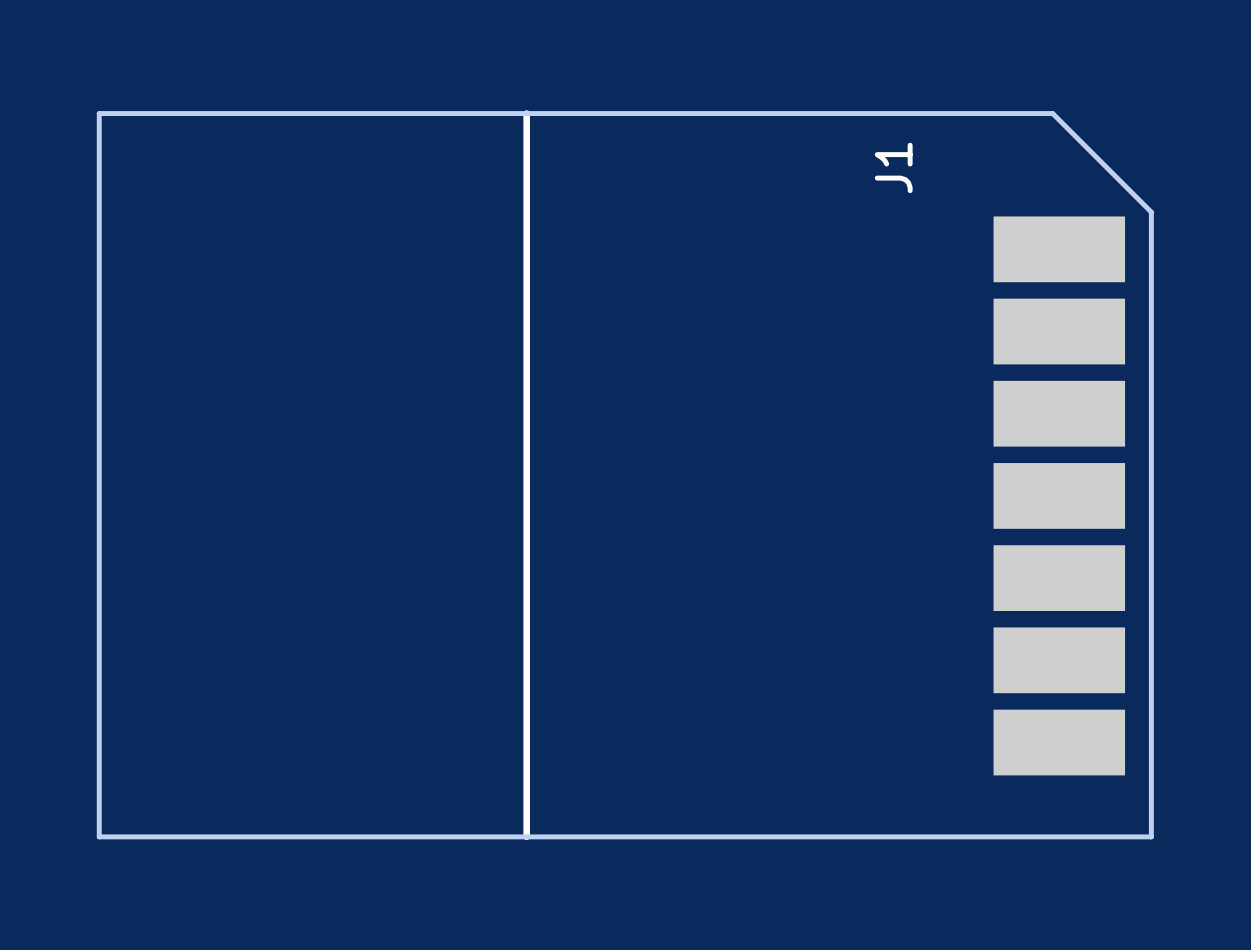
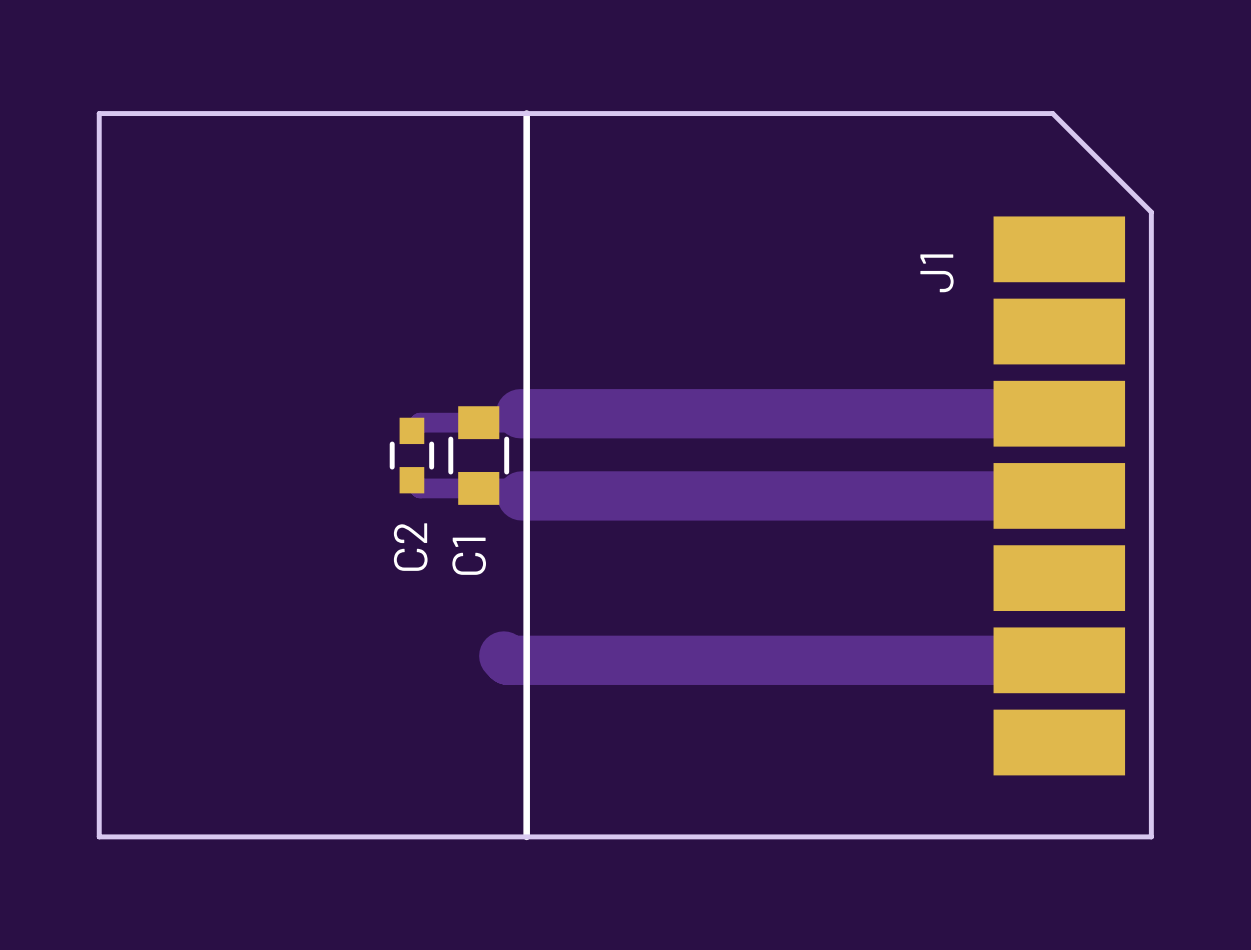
J1 name position: J1 (893, 167) -> J1 (937, 273)
track: none -> (1059, 413) (520, 413) (511, 422) (420, 422) (411, 430)
C2: none -> (411, 455)
C1: none -> (478, 455)
track: none -> (411, 480) (420, 488) (514, 488) (521, 495) (1059, 495)
track: none -> (503, 655) (508, 660) (1059, 660)

